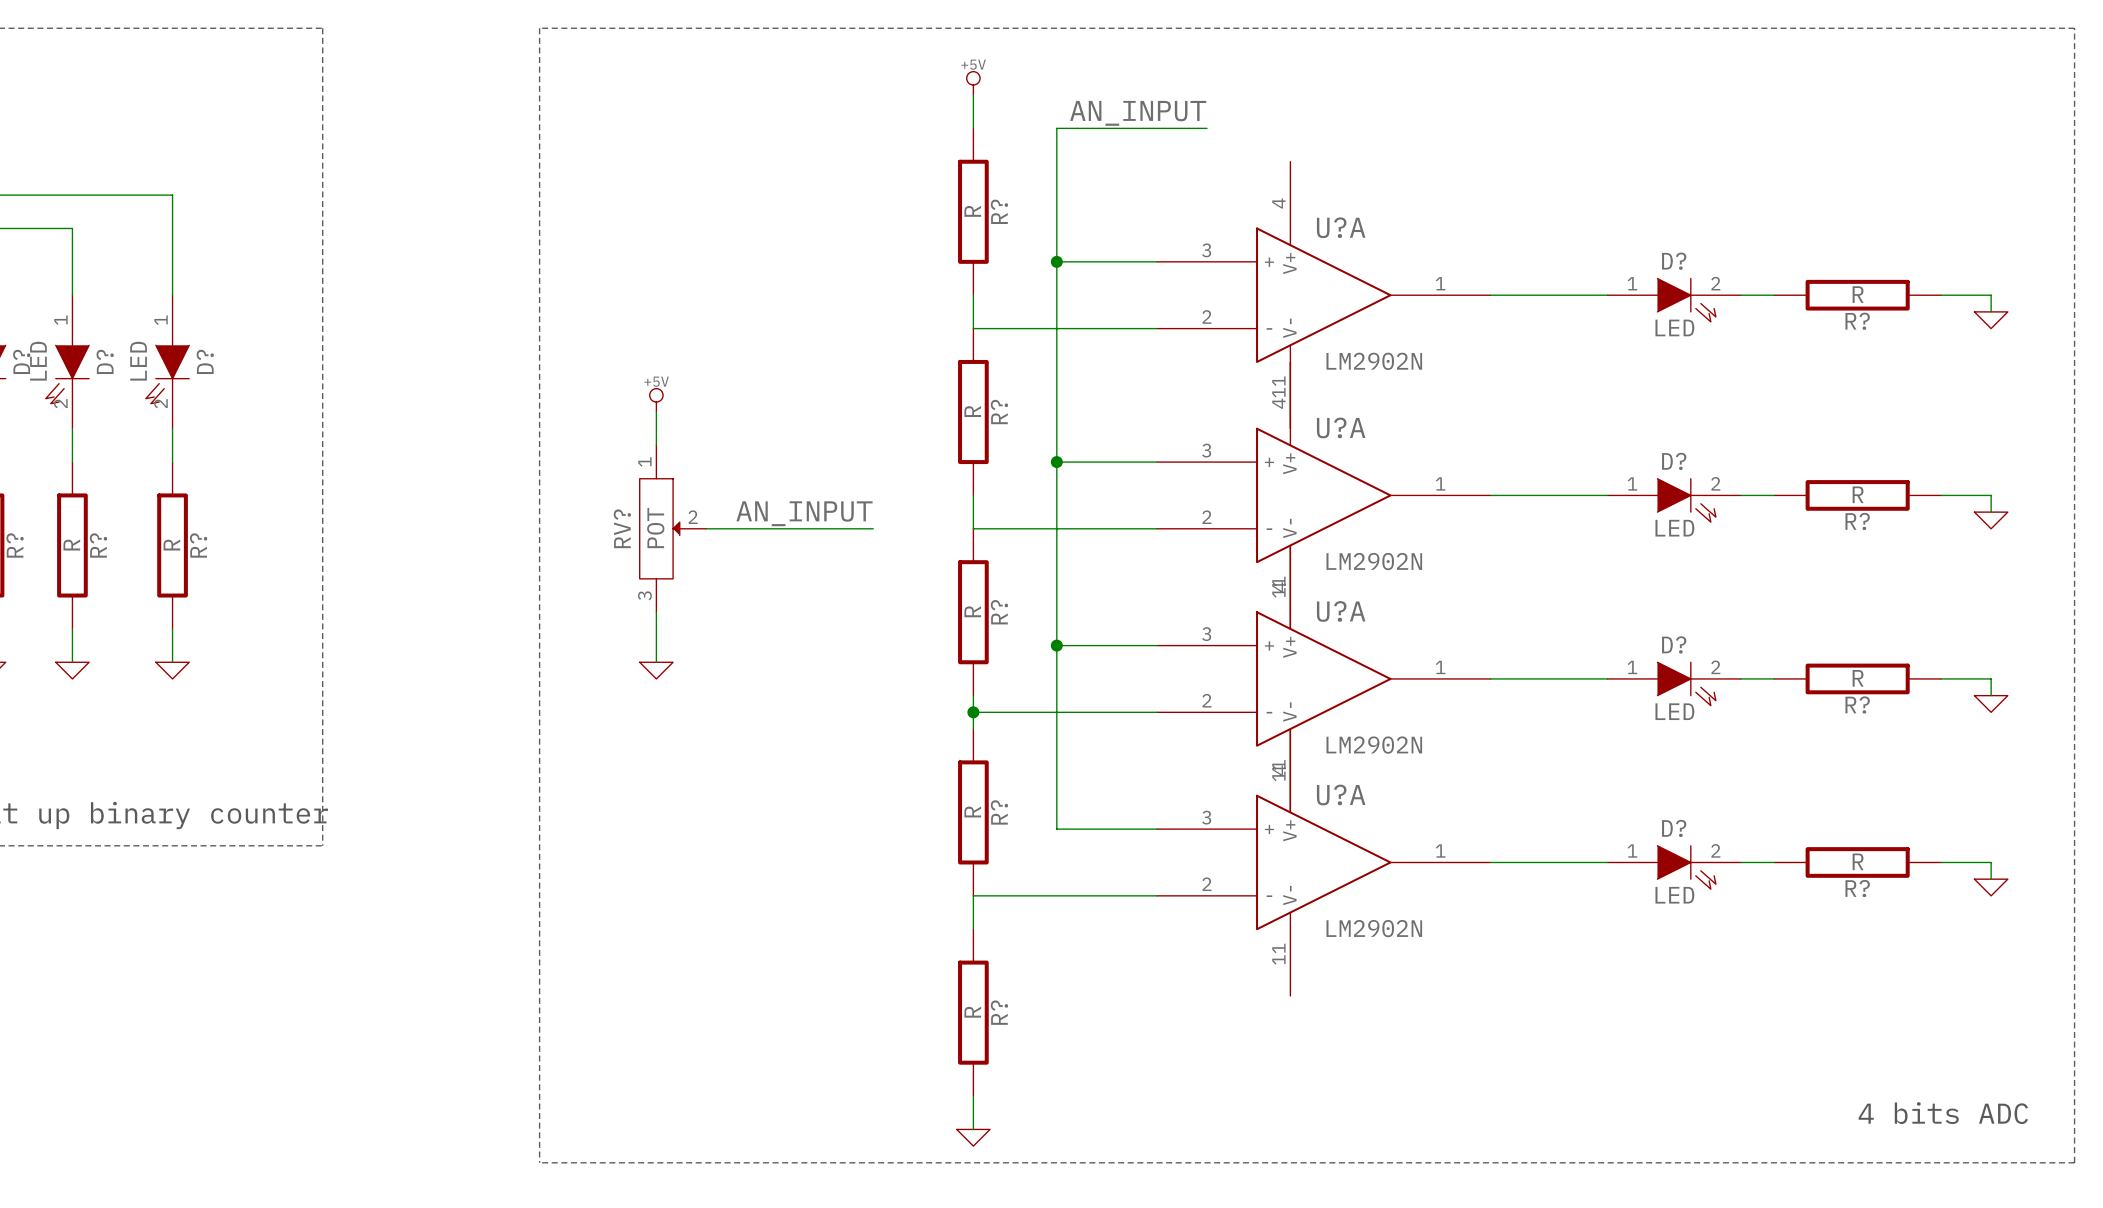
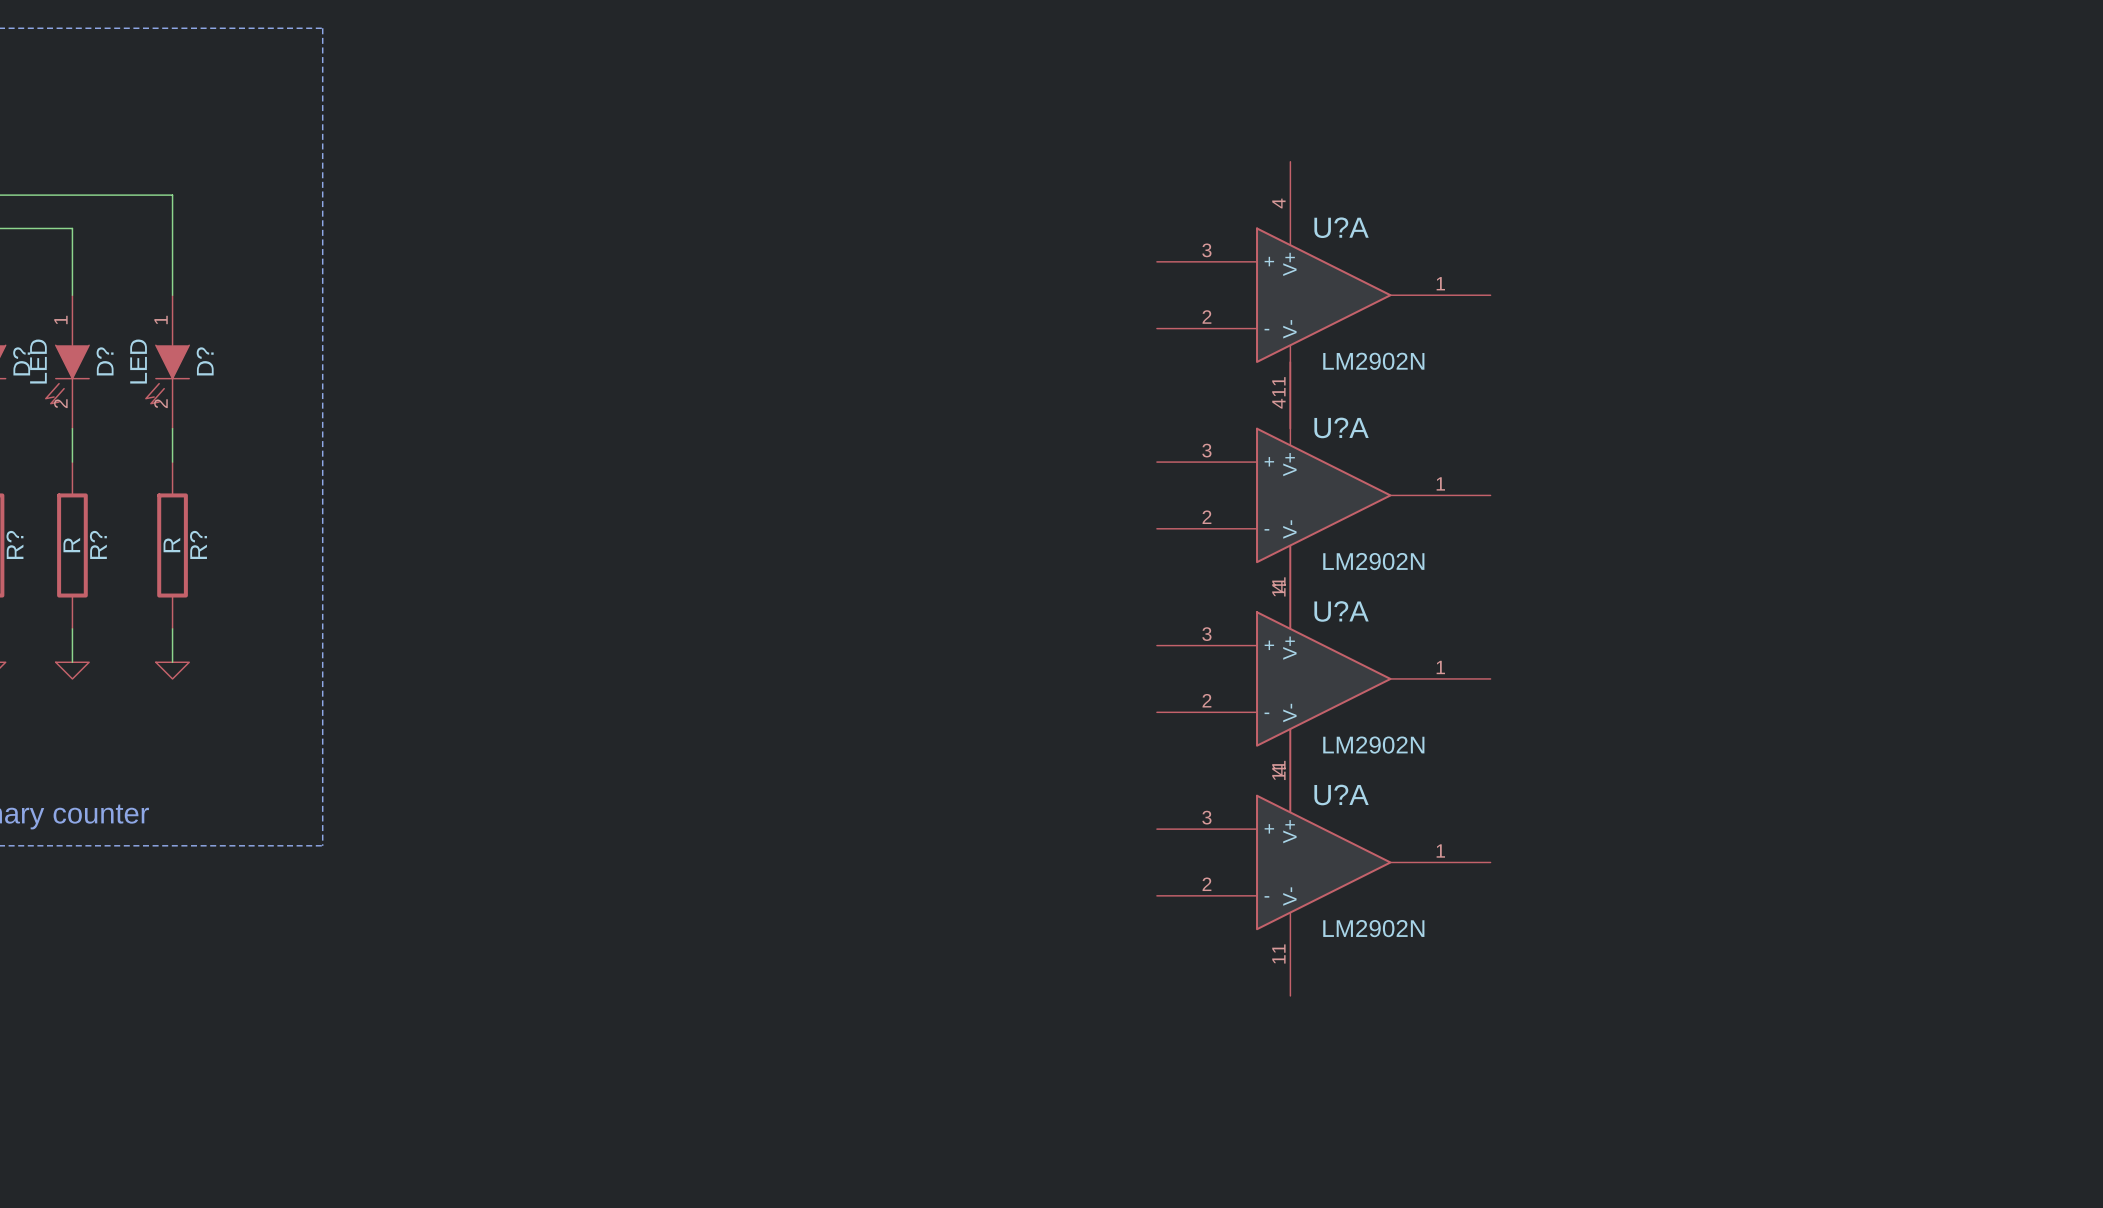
line: (539, 28) (2074, 28) (2074, 1162) (539, 1162) (539, 28) -> none
power symbol: +5V (973, 83) -> none
wire: (973, 95) (973, 128) -> none
label: AN_INPUT (1138, 113) -> none
wire: (1206, 128) (1056, 128) (1056, 829) (1156, 829) -> none
R?: R (973, 211) -> none
wire: (1056, 261) (1156, 261) -> none
junction: (1056, 261) -> none
wire: (973, 295) (973, 328) (1156, 328) -> none
wire: (1490, 295) (1607, 295) -> none
wire: (1740, 295) (1774, 295) -> none
R?: R (1857, 295) -> none
wire: (1941, 295) (1991, 295) (1991, 311) -> none
D?: LED (1674, 300) -> none
power symbol: (1991, 320) -> none
power symbol: +5V (656, 400) -> none
wire: (656, 412) (656, 445) -> none
R?: R (973, 412) -> none
wire: (1056, 462) (1156, 462) -> none
junction: (1056, 462) -> none
wire: (973, 495) (973, 528) (1156, 528) -> none
wire: (1490, 495) (1607, 495) -> none
wire: (1740, 495) (1774, 495) -> none
R?: R (1857, 495) -> none
wire: (1941, 495) (1991, 495) (1991, 512) -> none
D?: LED (1674, 500) -> none
label: AN_INPUT (804, 513) -> none
power symbol: (1991, 520) -> none
RV?: POT (673, 528) -> none
wire: (706, 528) (873, 528) -> none
wire: (656, 612) (656, 662) -> none
R?: R (973, 612) -> none
wire: (1056, 645) (1156, 645) -> none
junction: (1056, 645) -> none
power symbol: (656, 670) -> none
wire: (1490, 678) (1607, 678) -> none
wire: (1740, 678) (1774, 678) -> none
R?: R (1857, 678) -> none
wire: (1941, 678) (1991, 678) (1991, 695) -> none
D?: LED (1674, 683) -> none
wire: (973, 695) (973, 729) -> none
power symbol: (1991, 703) -> none
wire: (973, 712) (1156, 712) -> none
junction: (973, 712) -> none
R?: R (973, 812) -> none
wire: (1490, 862) (1607, 862) -> none
wire: (1740, 862) (1774, 862) -> none
R?: R (1857, 862) -> none
wire: (1941, 862) (1991, 862) (1991, 879) -> none
D?: LED (1674, 867) -> none
power symbol: (1991, 887) -> none
wire: (1156, 895) (973, 895) (973, 929) -> none
R?: R (973, 1012) -> none
wire: (973, 1096) (973, 1129) -> none
text: 4 bits ADC (1943, 1113) -> none
power symbol: (973, 1137) -> none

